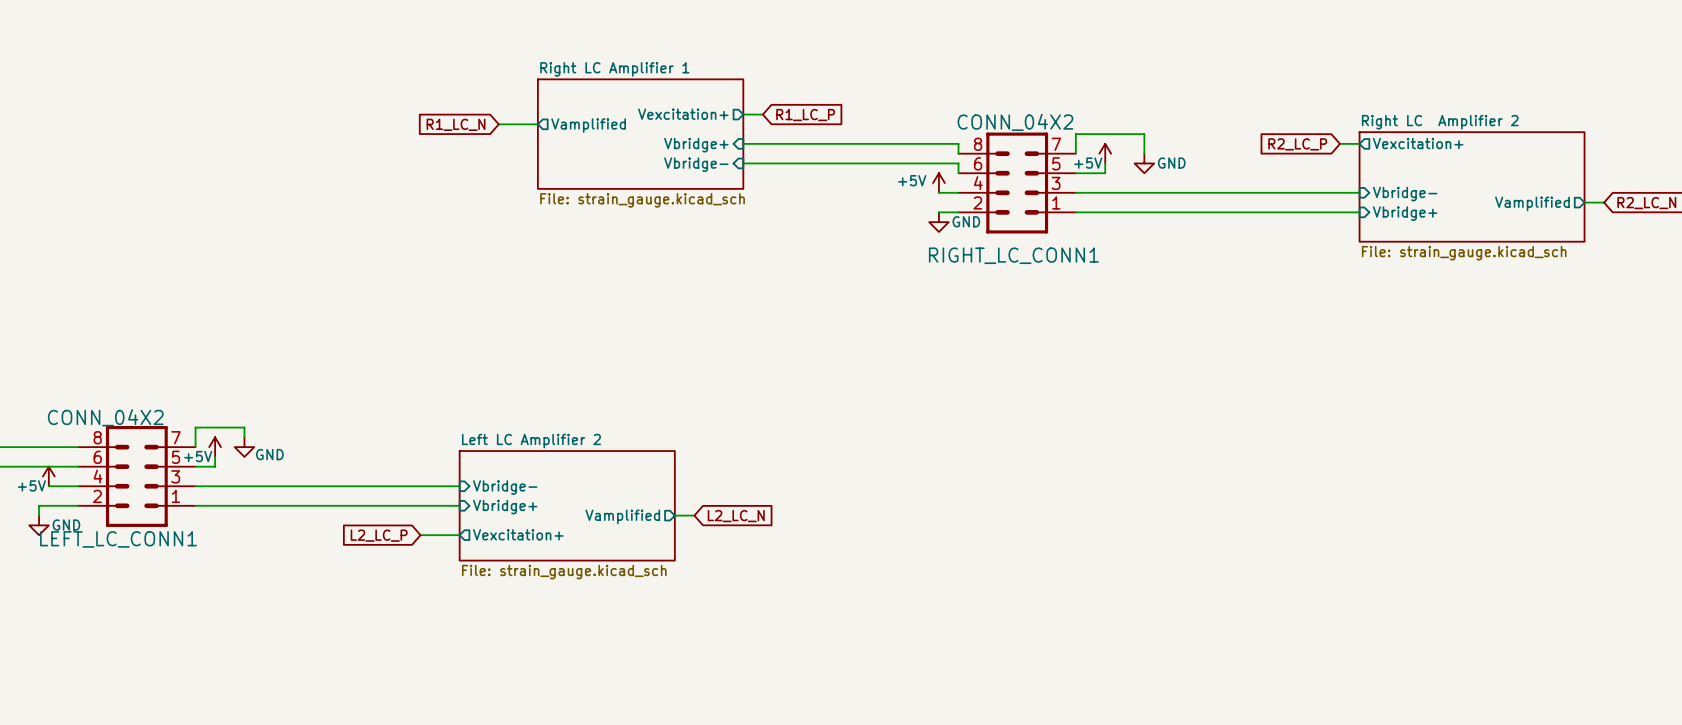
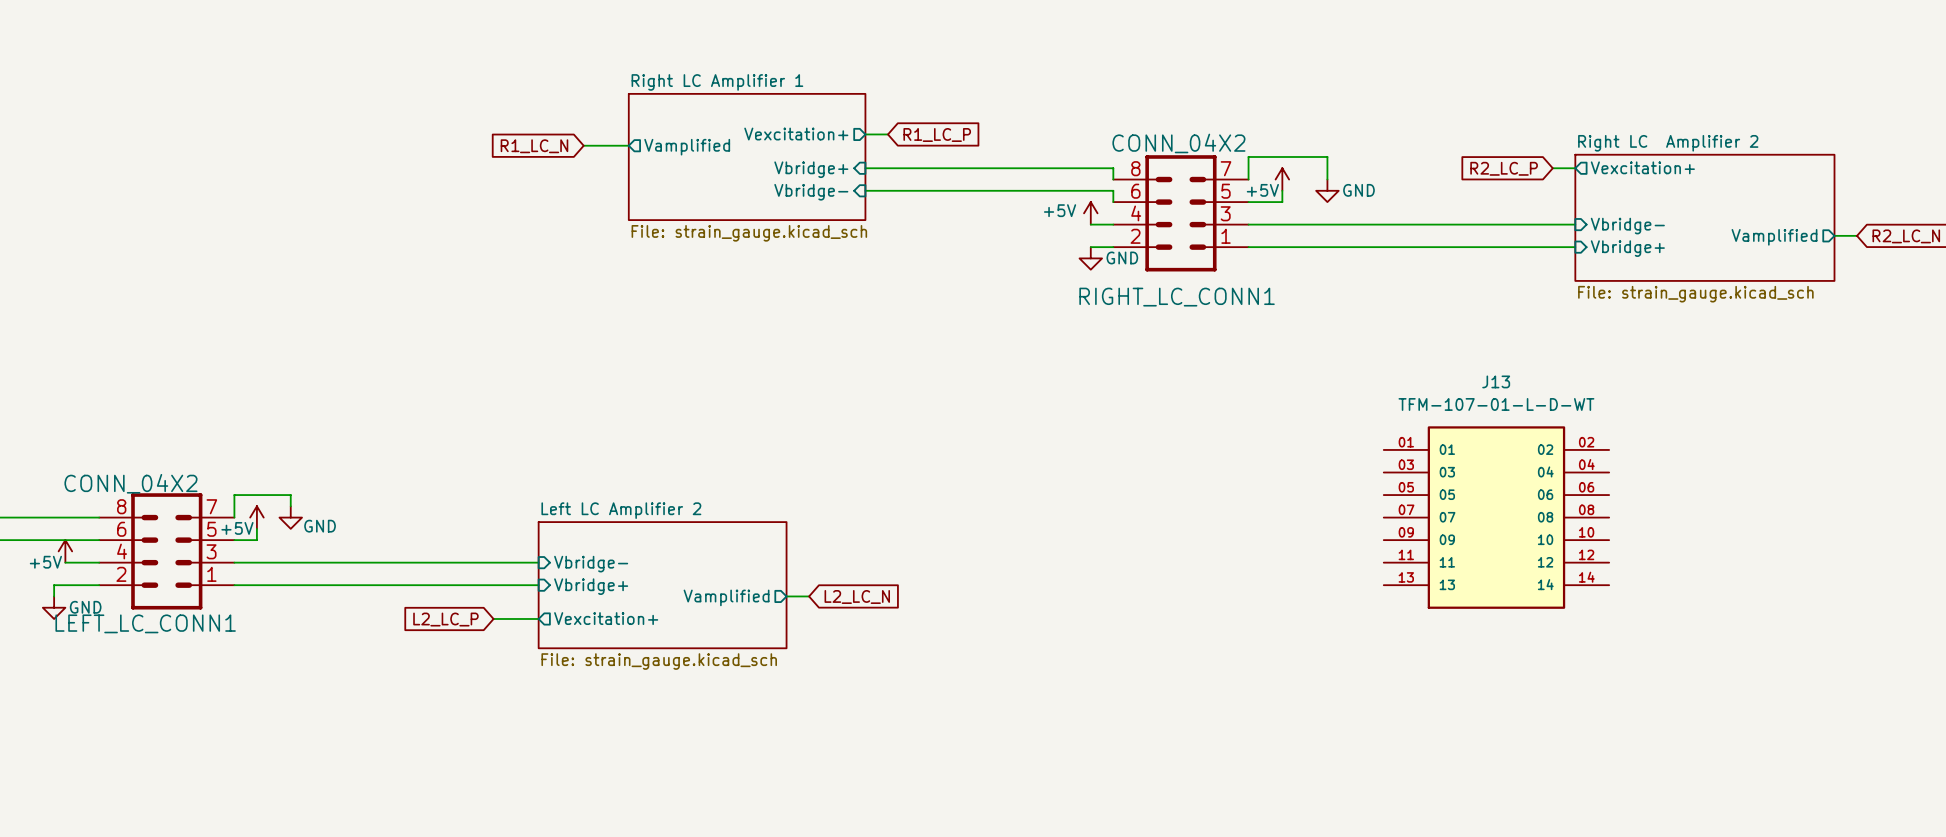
J13: none -> TFM-107-01-L-D-WT (1496, 517)

